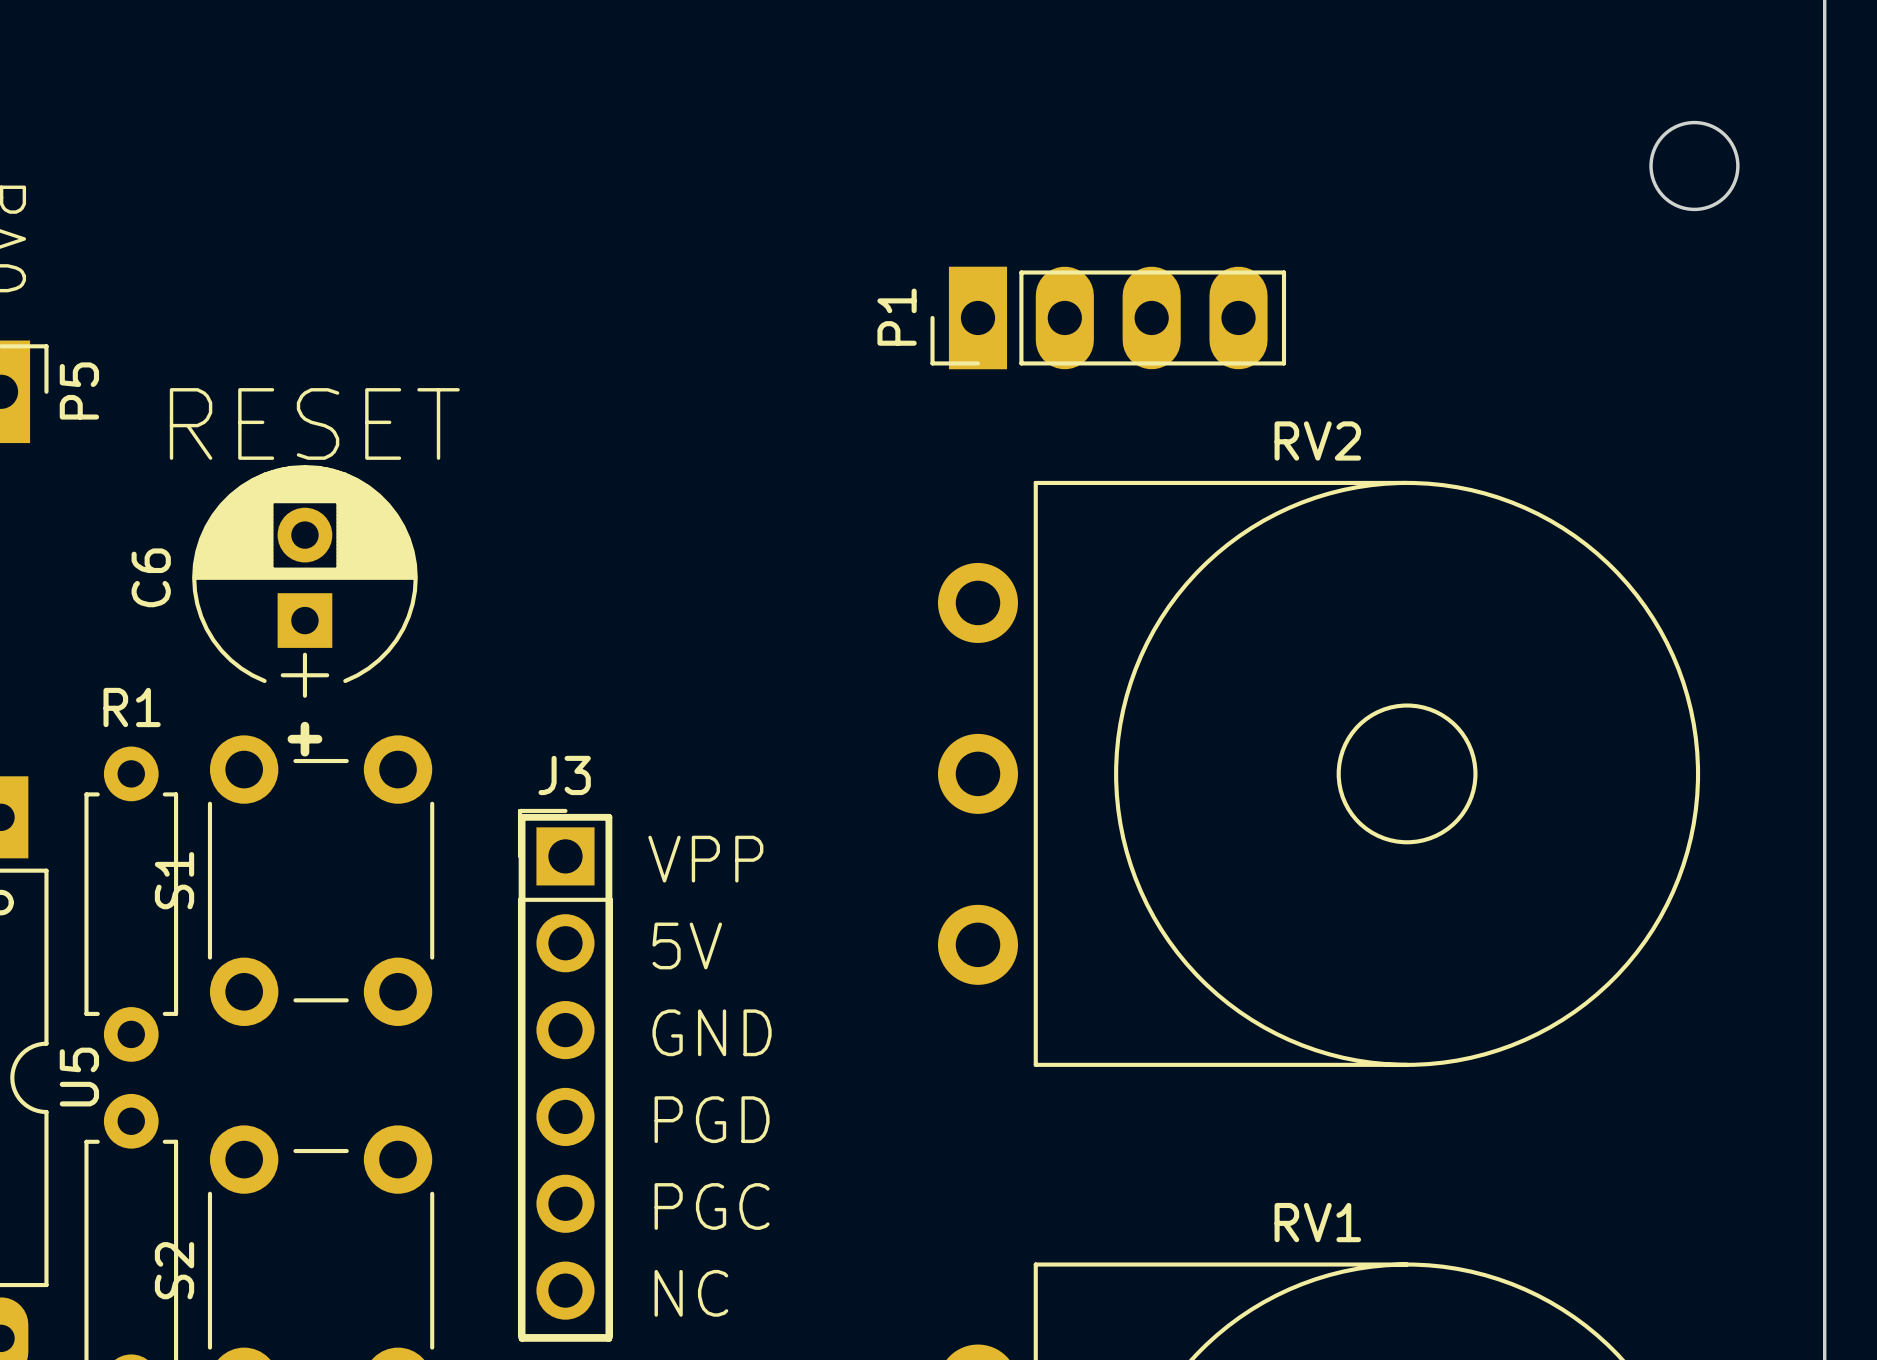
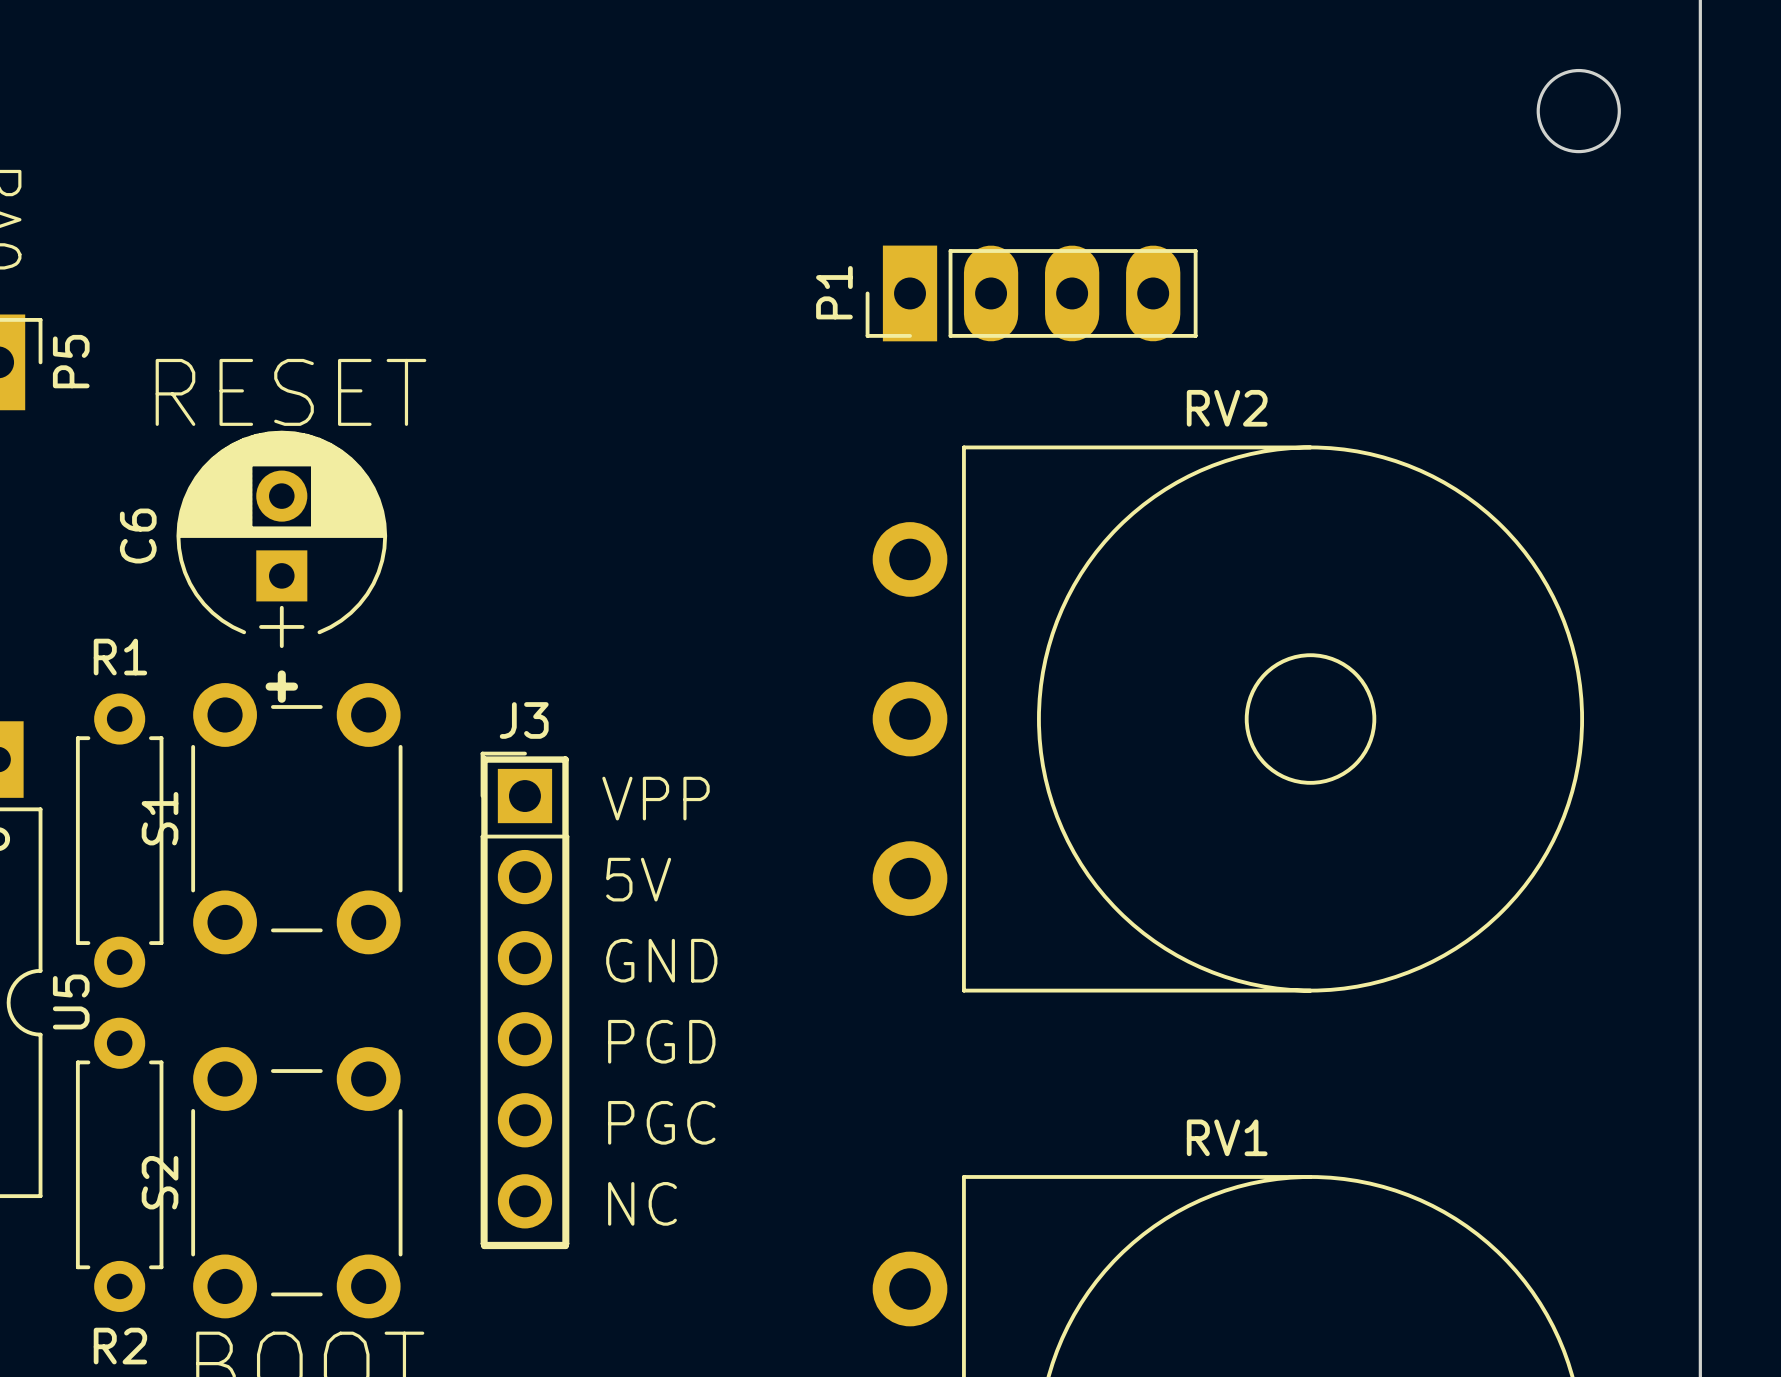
round board edge position: (1694, 166) -> (1578, 111)

